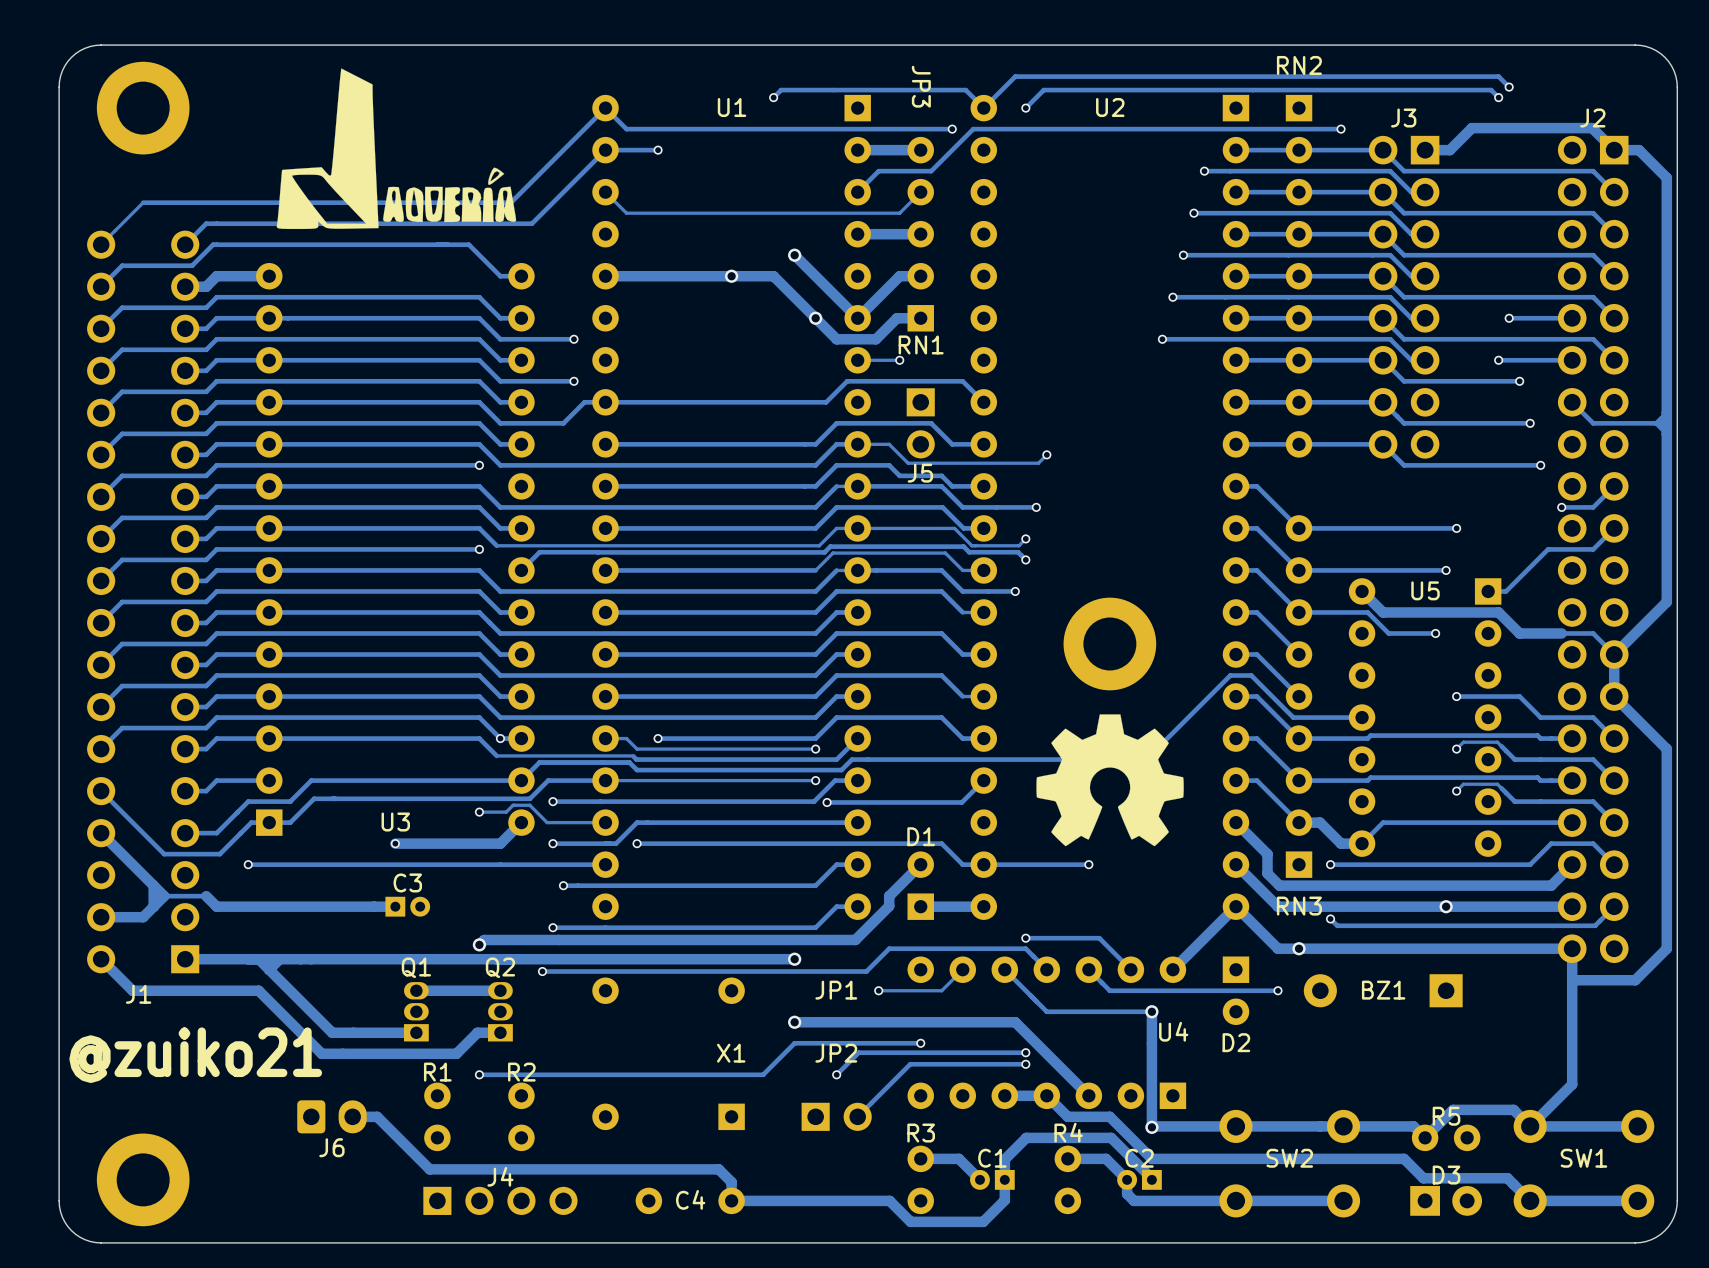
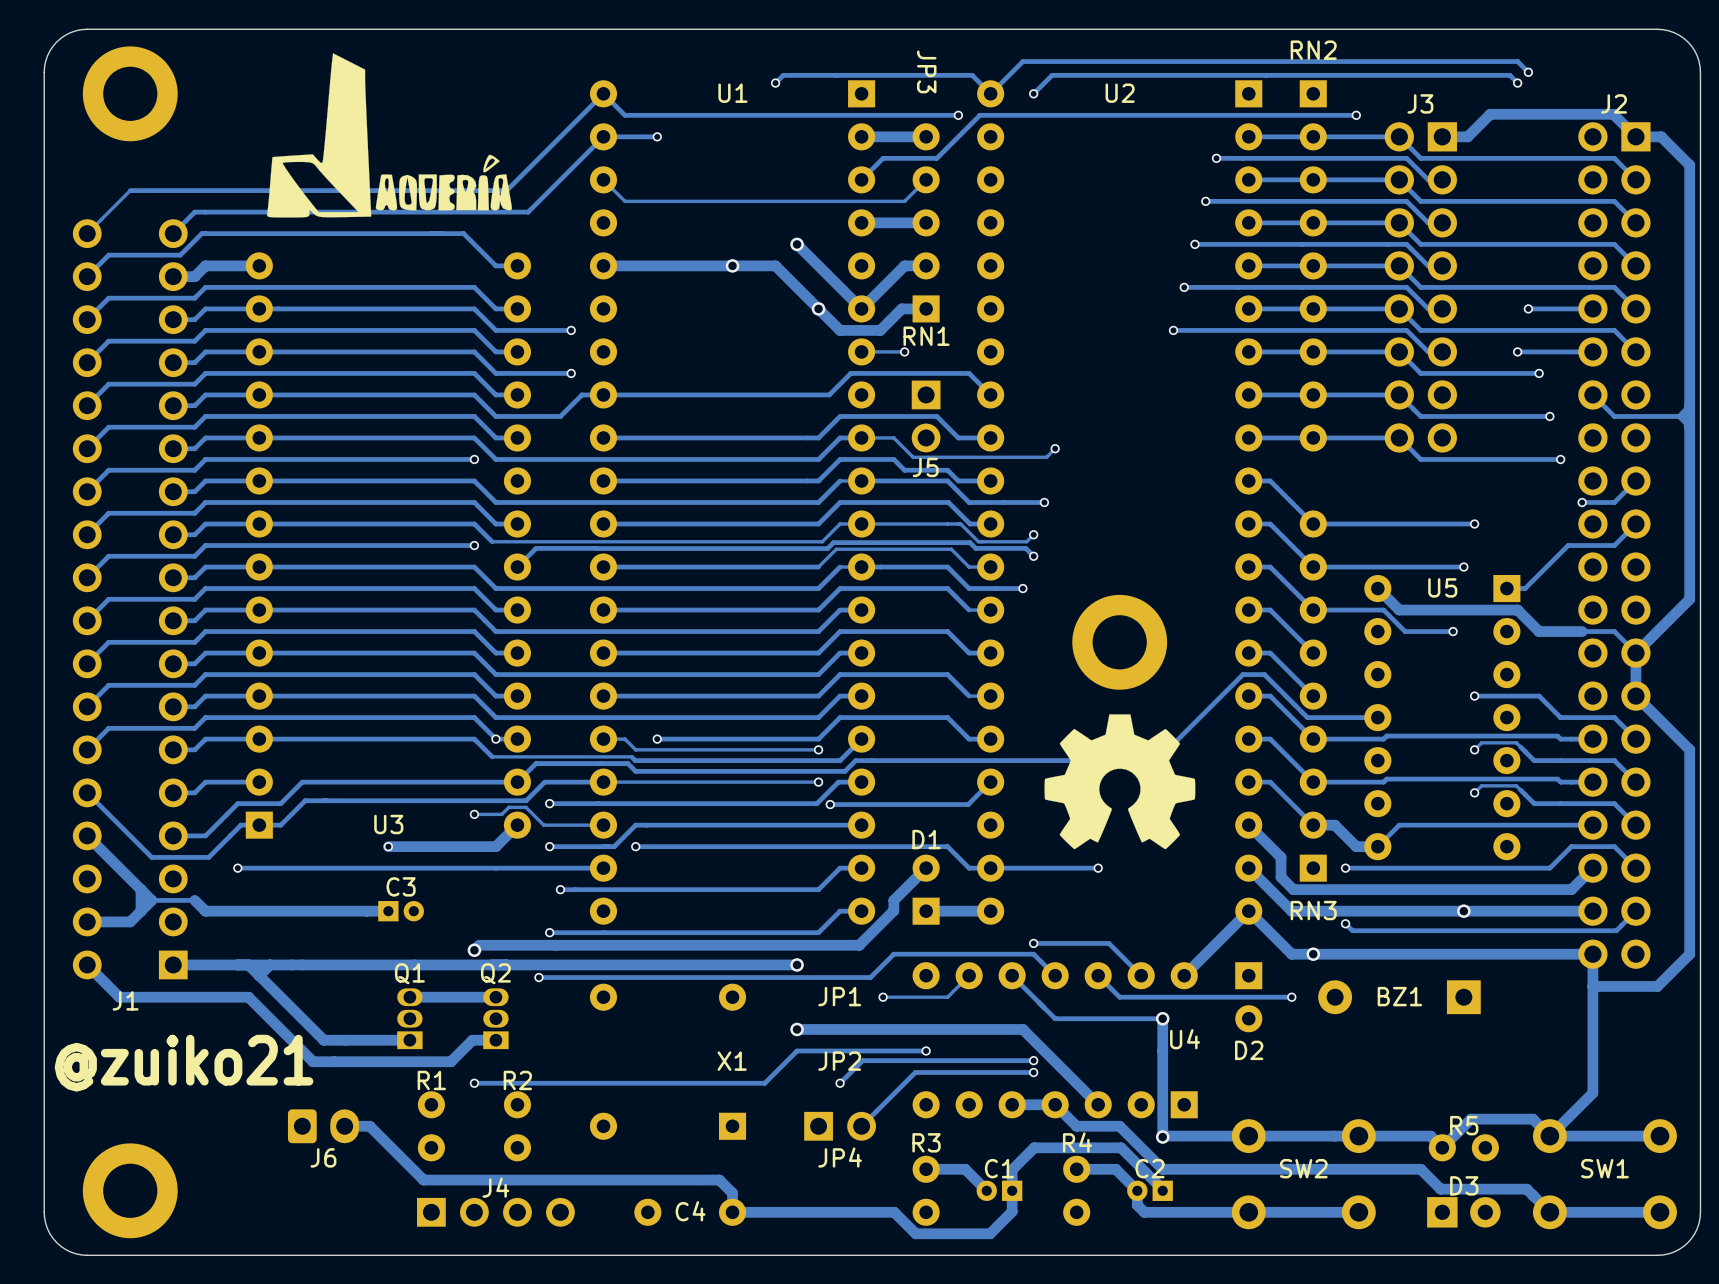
JP4 name: none -> JP4 (840, 1157)

